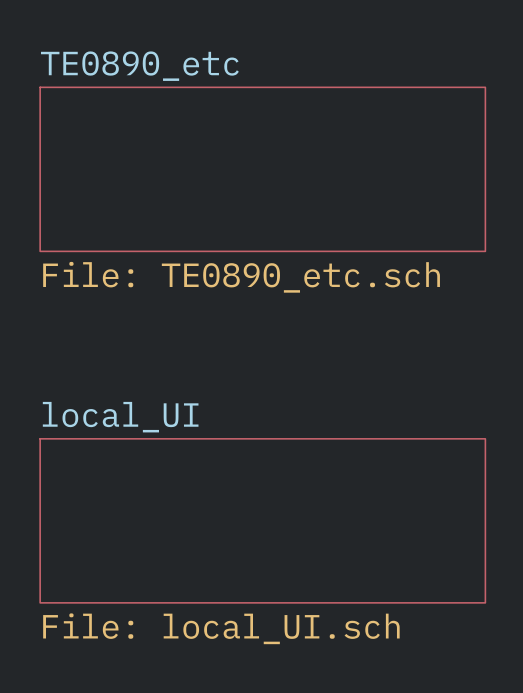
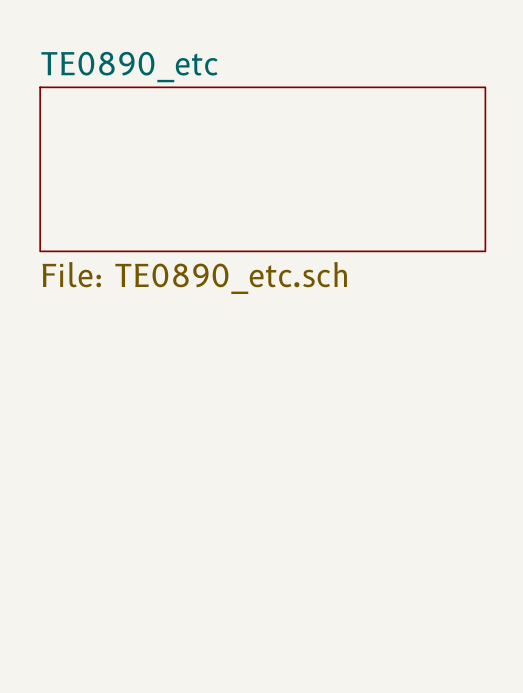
sheet local_UI: File: local_UI.sch (262, 520) -> none

